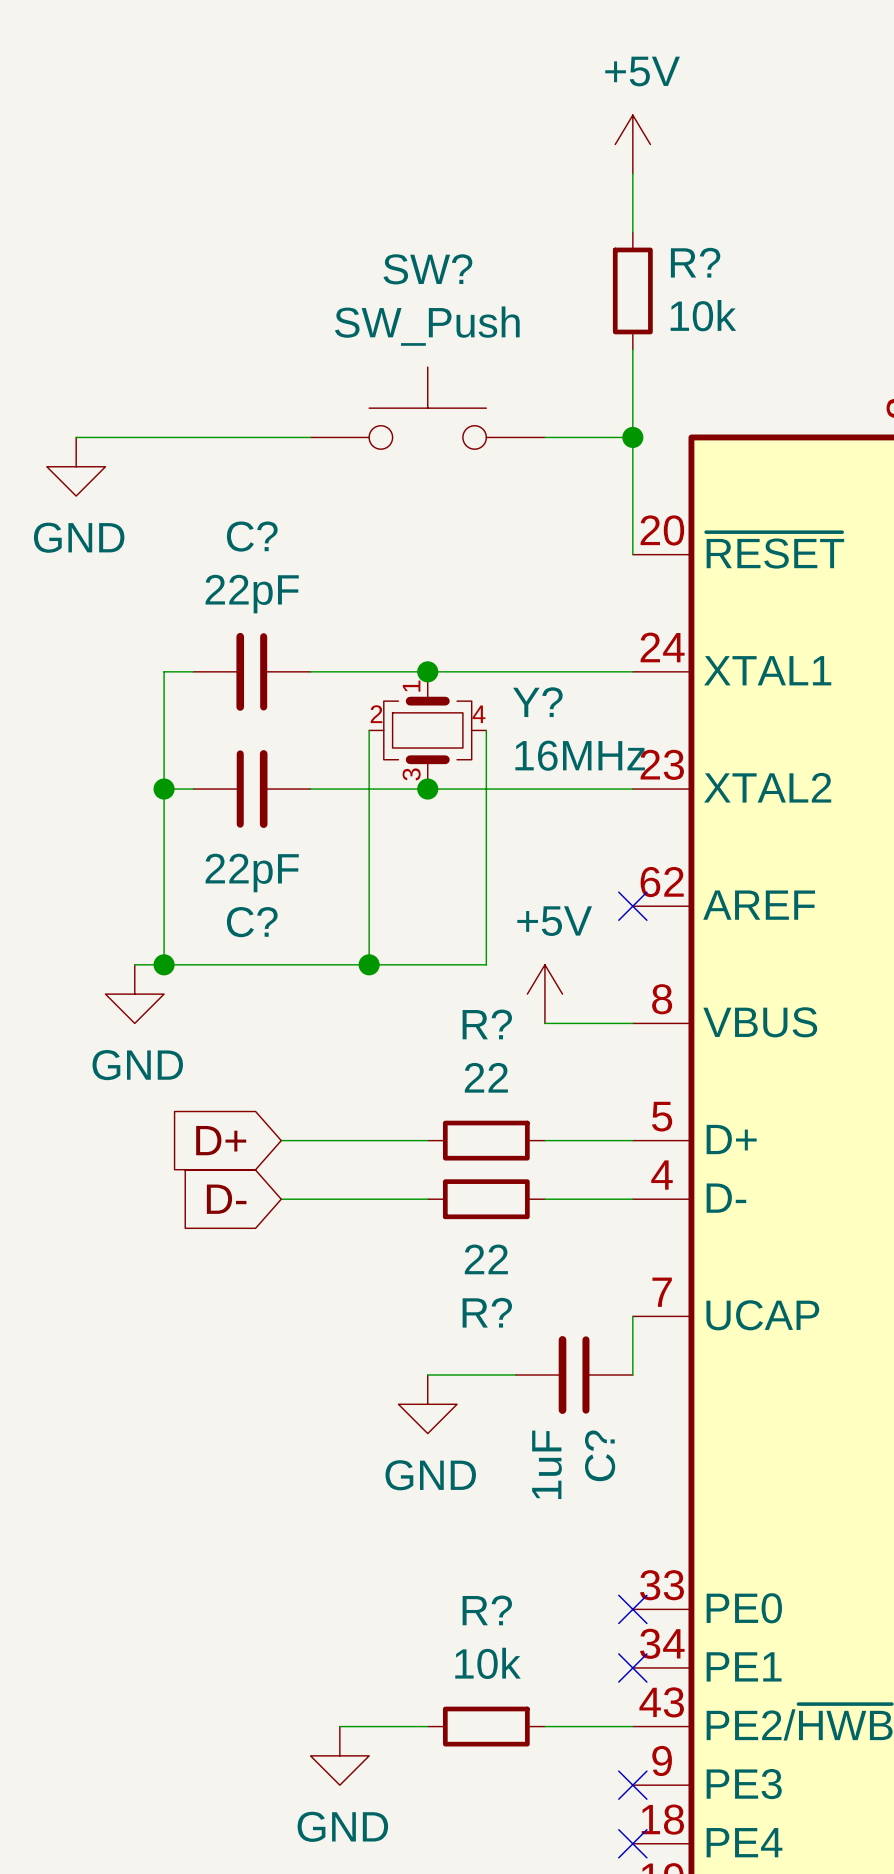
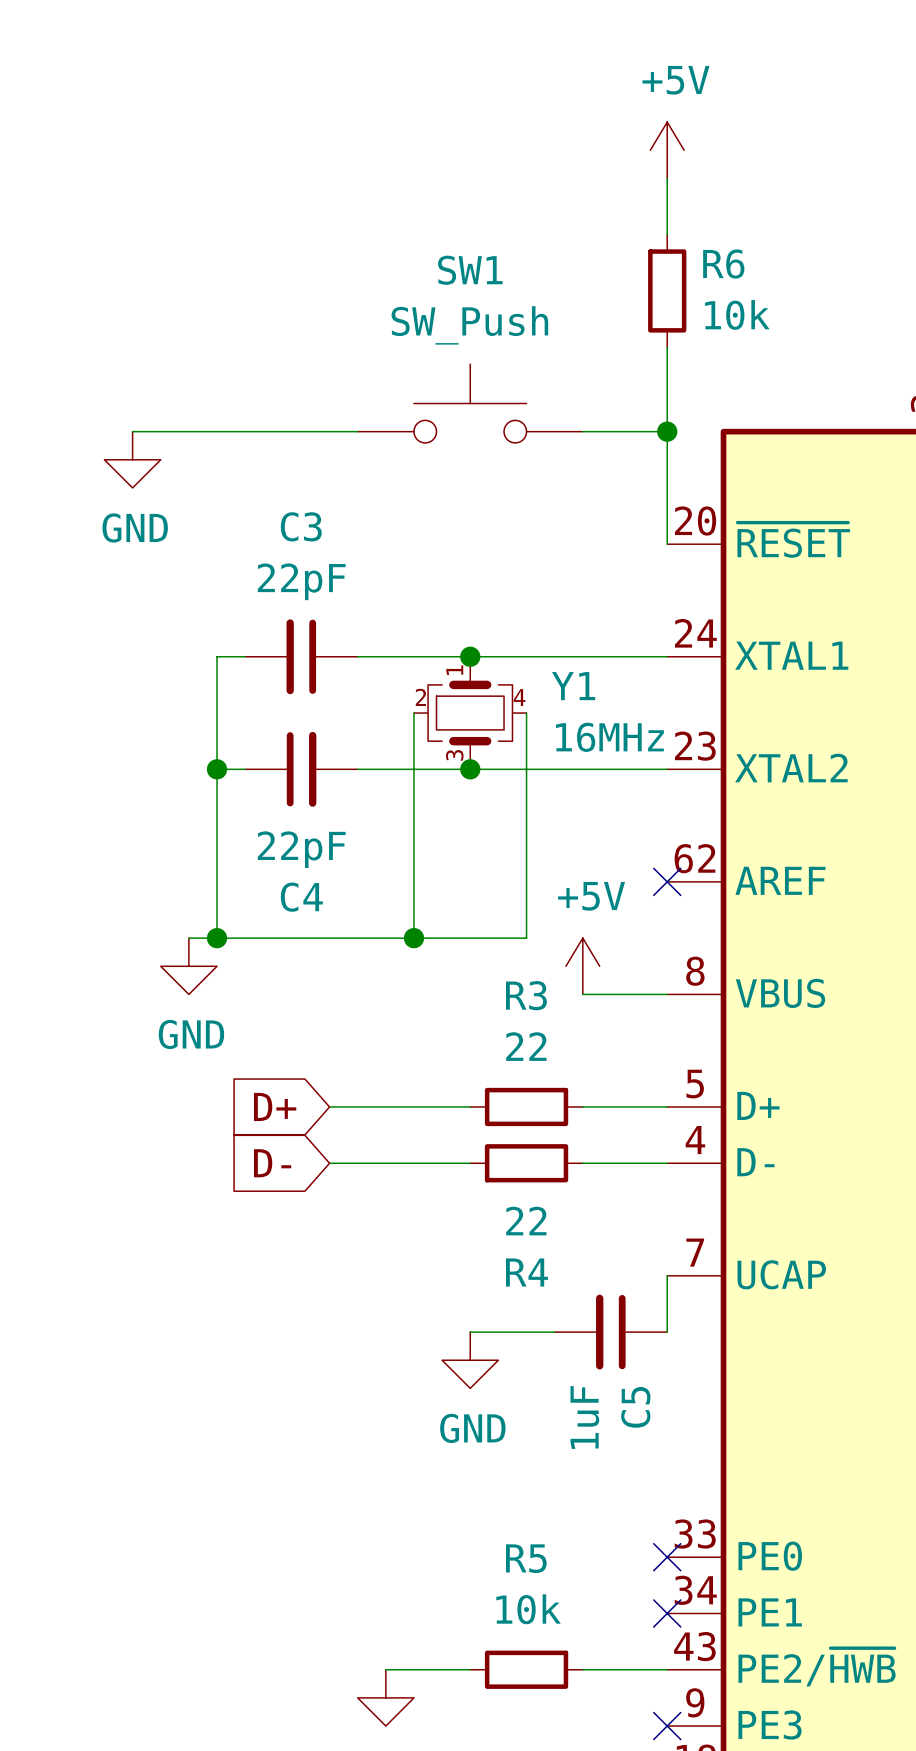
R? name: R? (695, 262) -> R6 (723, 264)
SW? name: SW? (427, 269) -> SW1 (470, 270)
C? name: C? (252, 536) -> C3 (301, 526)
Y? name: Y? (537, 702) -> Y1 (573, 686)
C? name: C? (252, 922) -> C4 (301, 897)
R? name: R? (487, 1024) -> R3 (526, 995)
R? name: R? (487, 1312) -> R4 (526, 1272)
C? name: C? (600, 1455) -> C5 (635, 1407)
R? name: R? (487, 1610) -> R5 (526, 1558)

